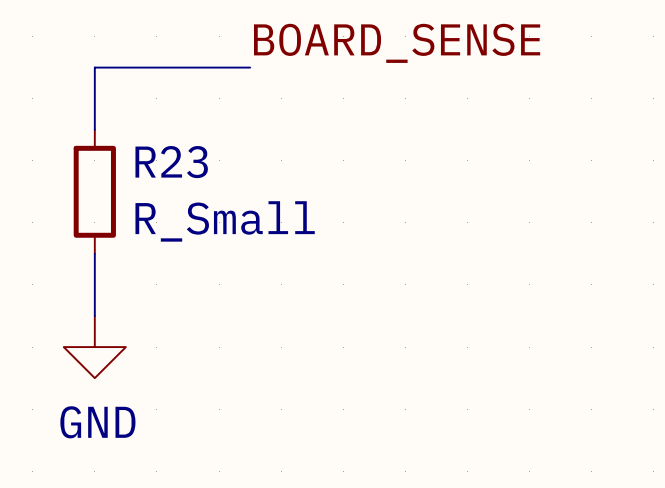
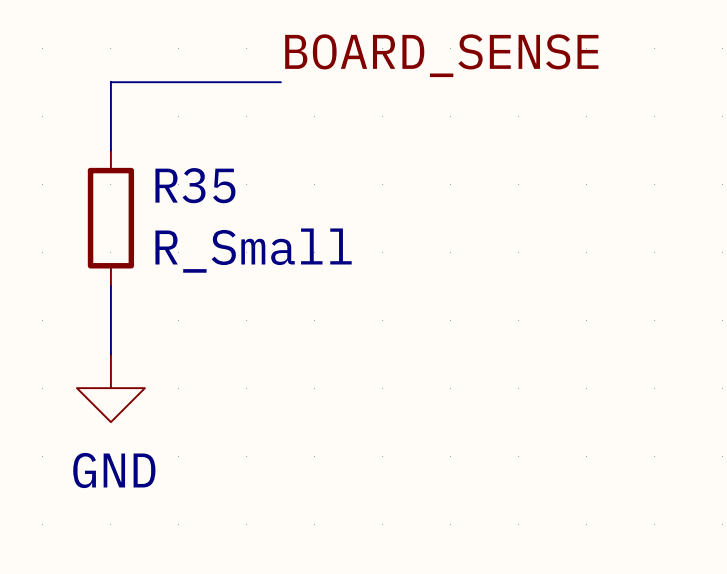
R23 name: R23 (171, 162) -> R35 (195, 185)

